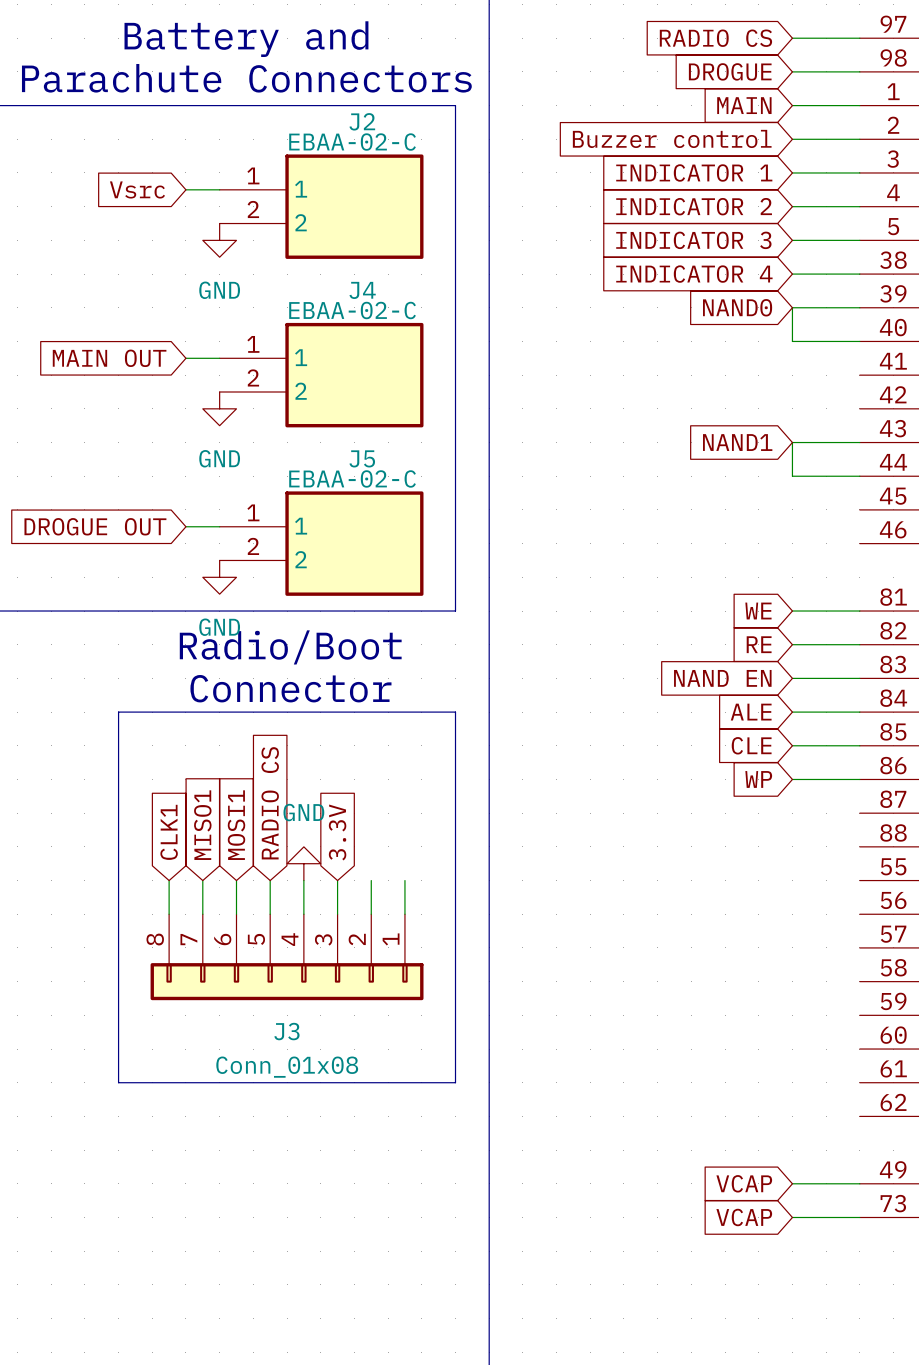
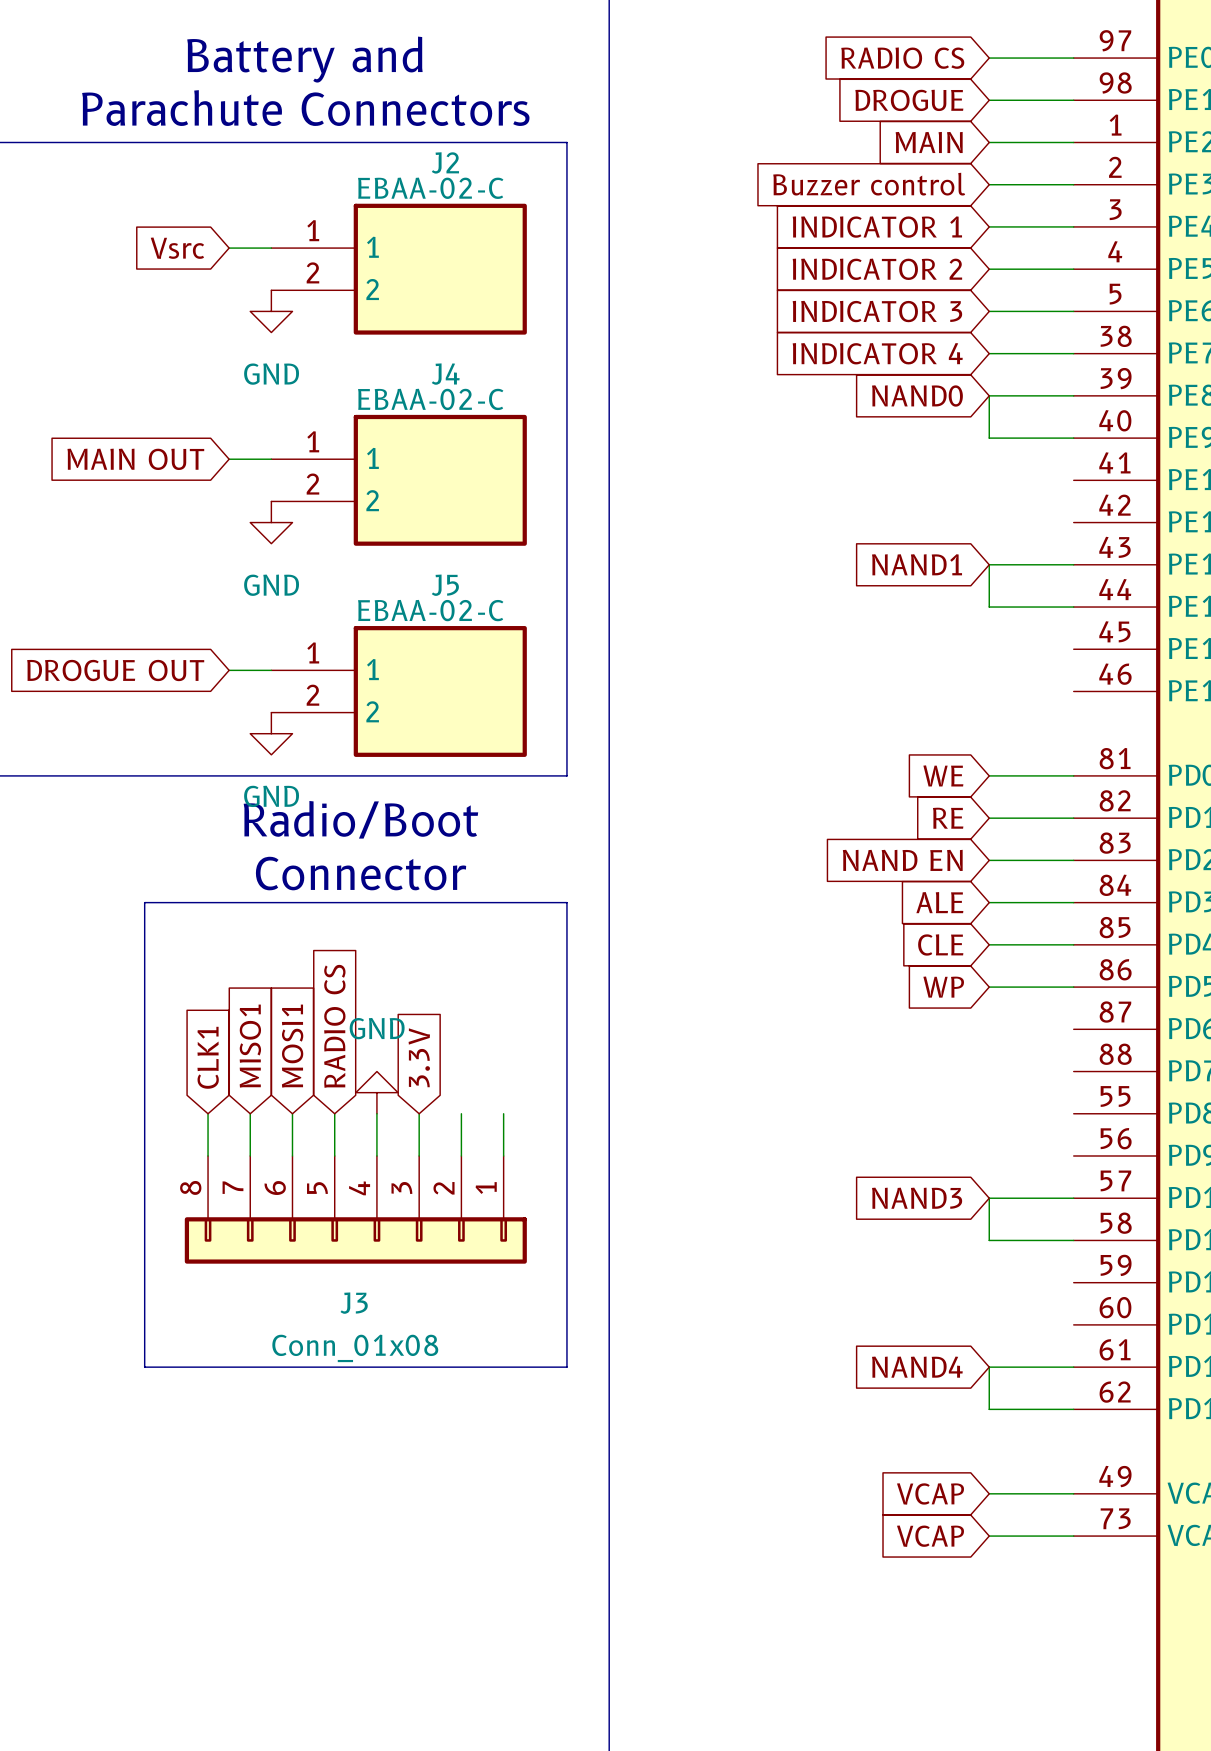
global label: none -> NAND3 (917, 1198)
wire: none -> (1073, 1198) (989, 1198) (989, 1240) (1073, 1240)
global label: none -> NAND4 (917, 1367)
wire: none -> (1073, 1367) (989, 1367) (989, 1409) (1073, 1409)

